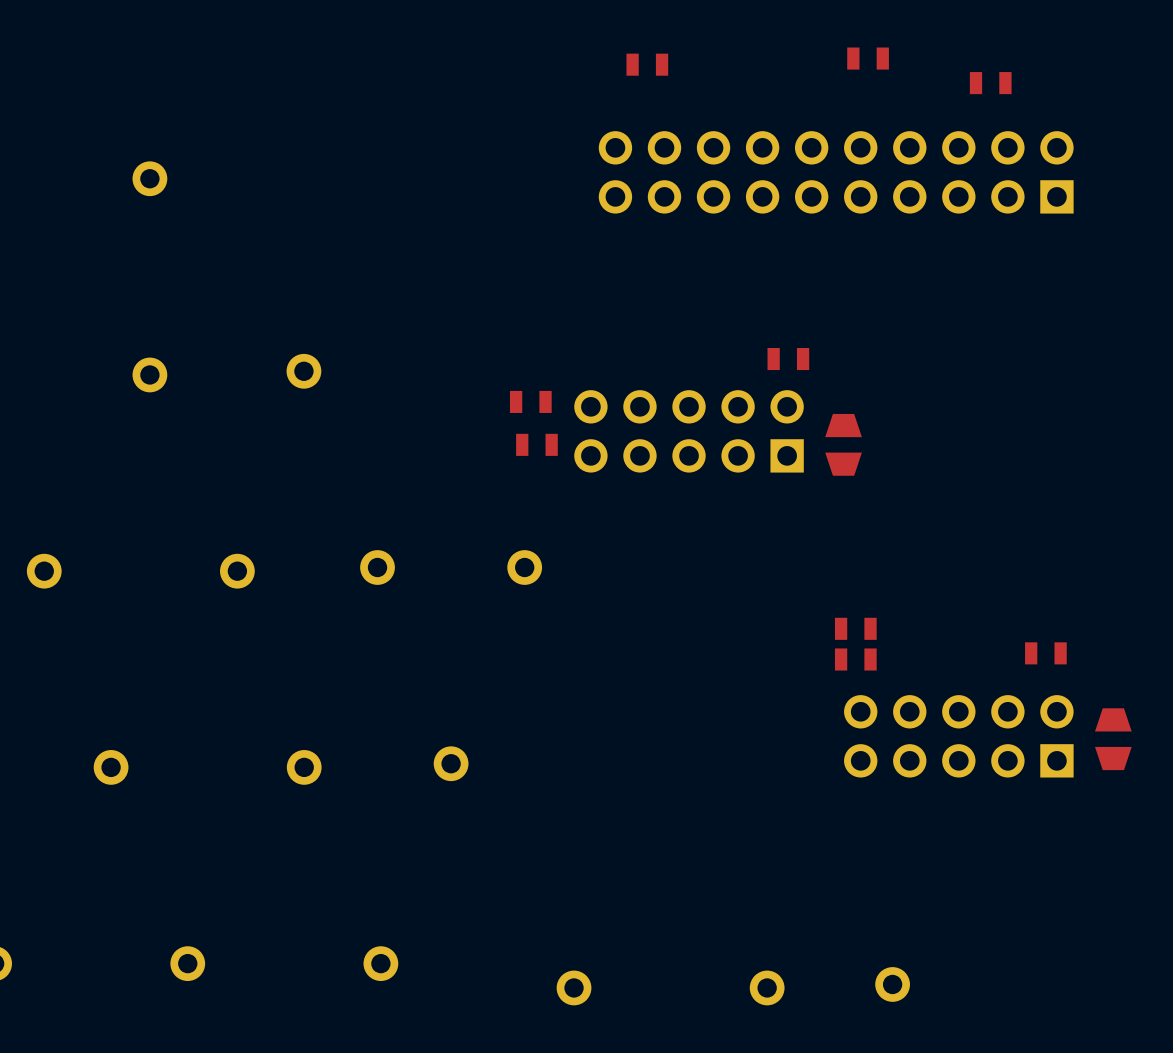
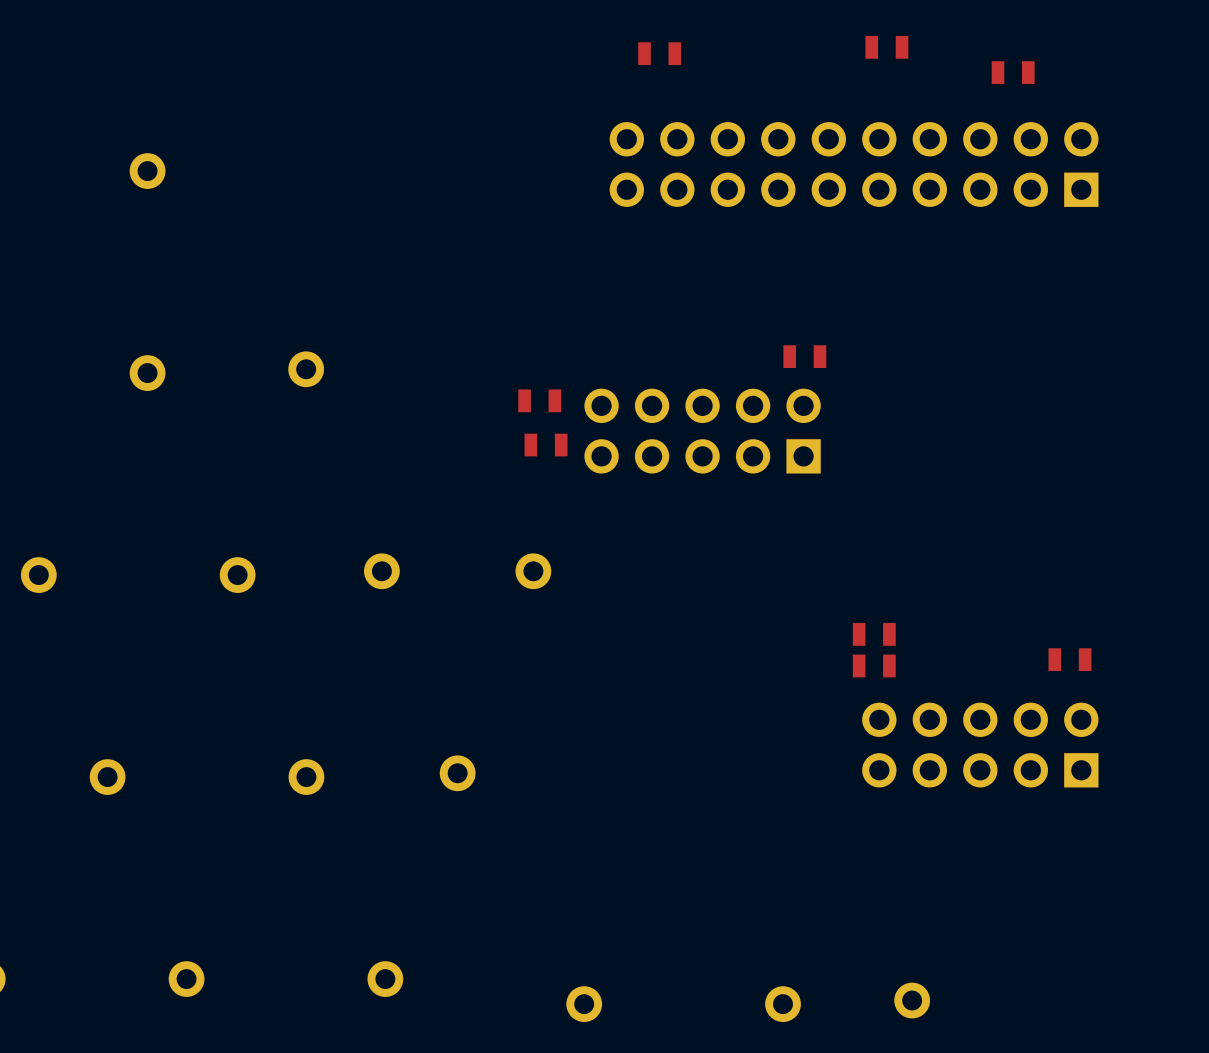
part: (843, 444) -> none
part: (1113, 739) -> none

